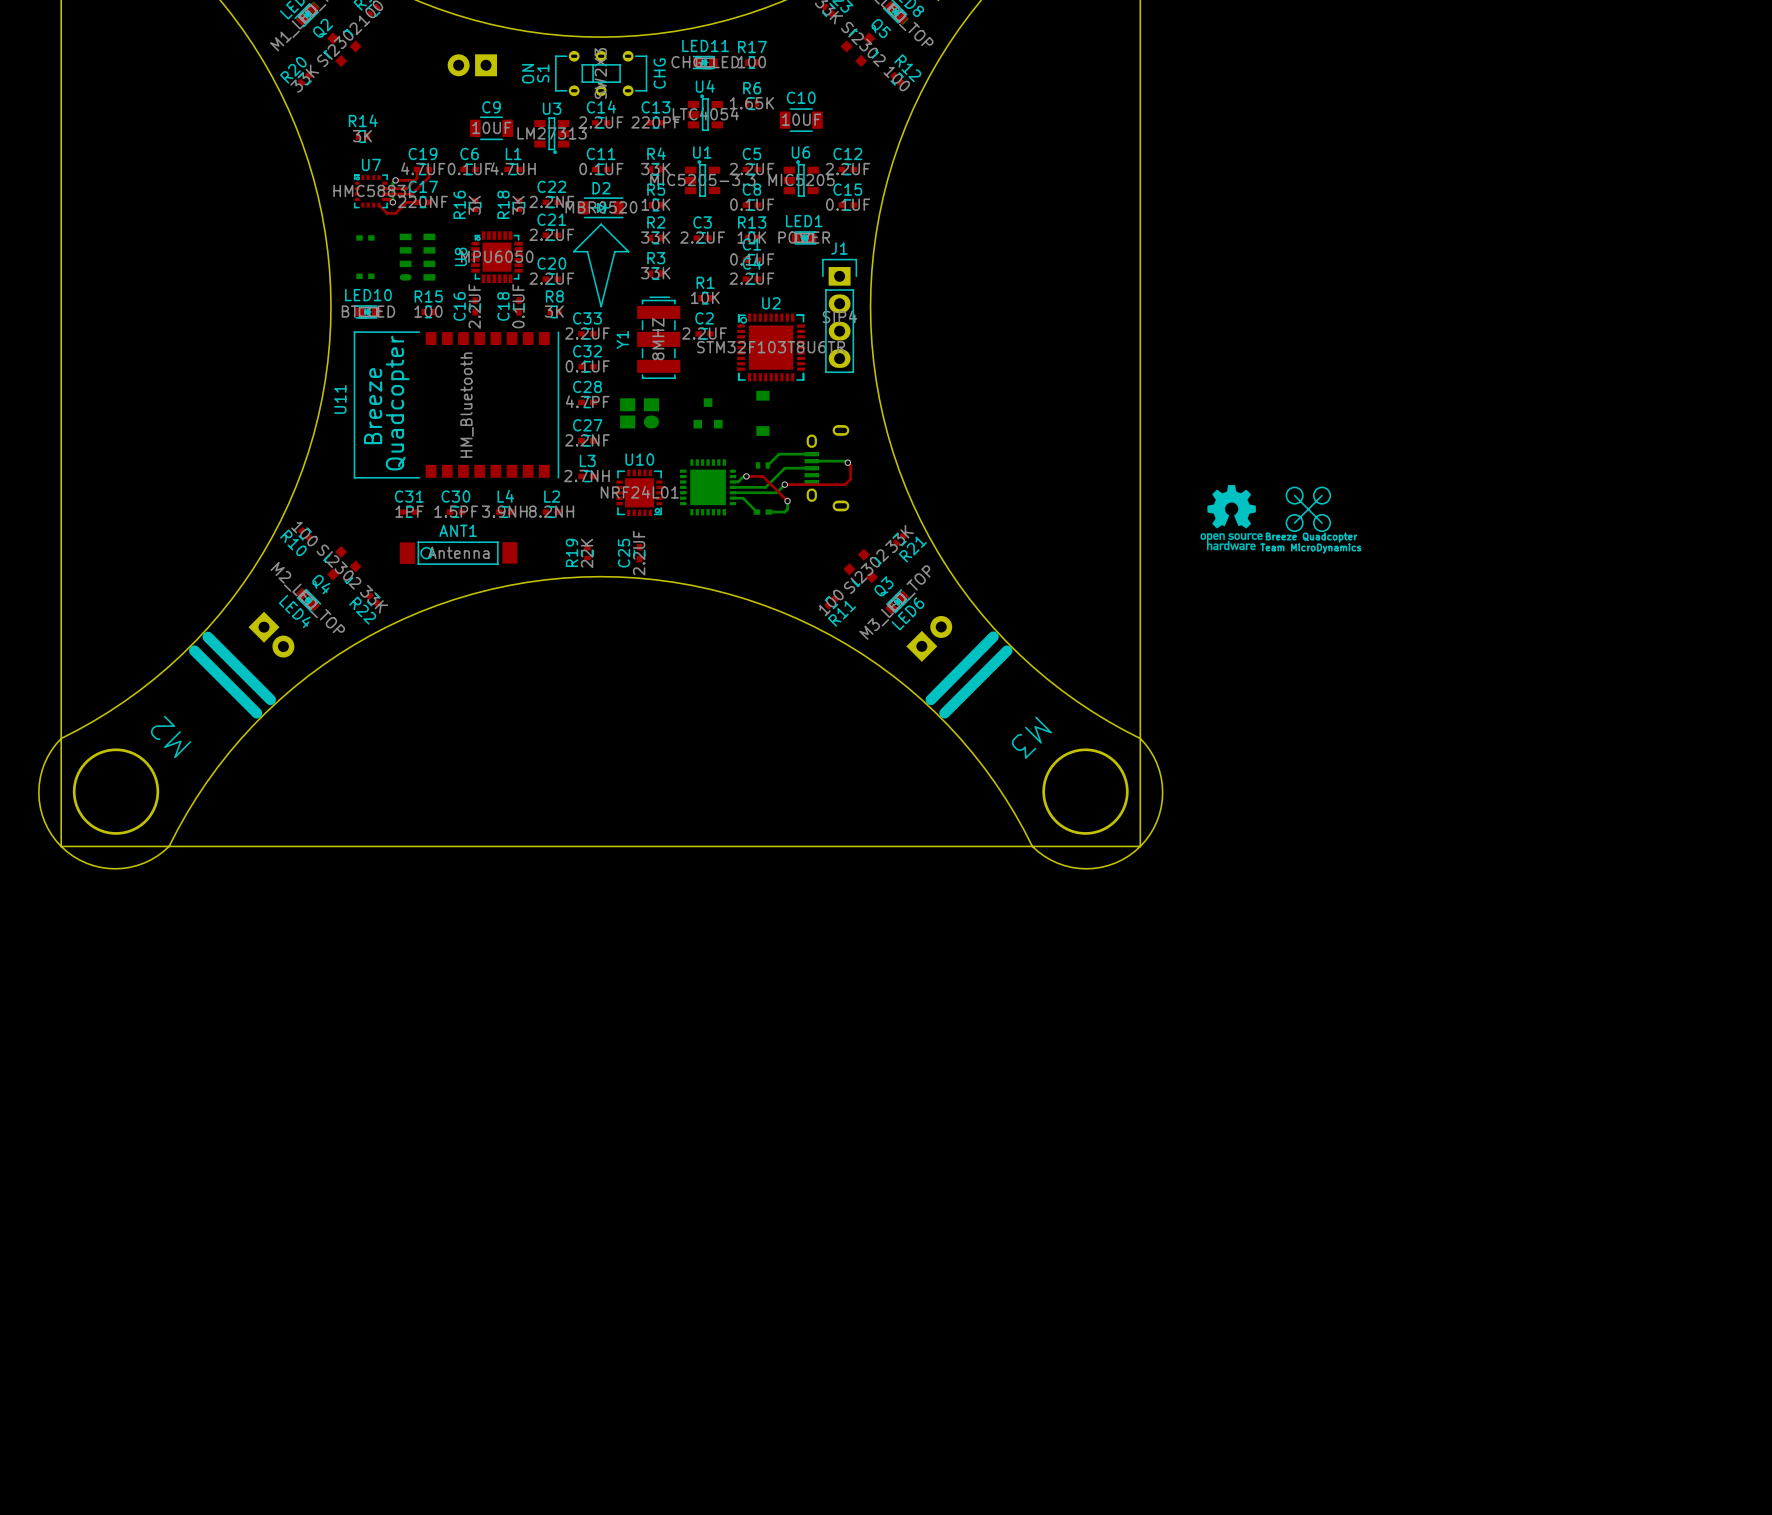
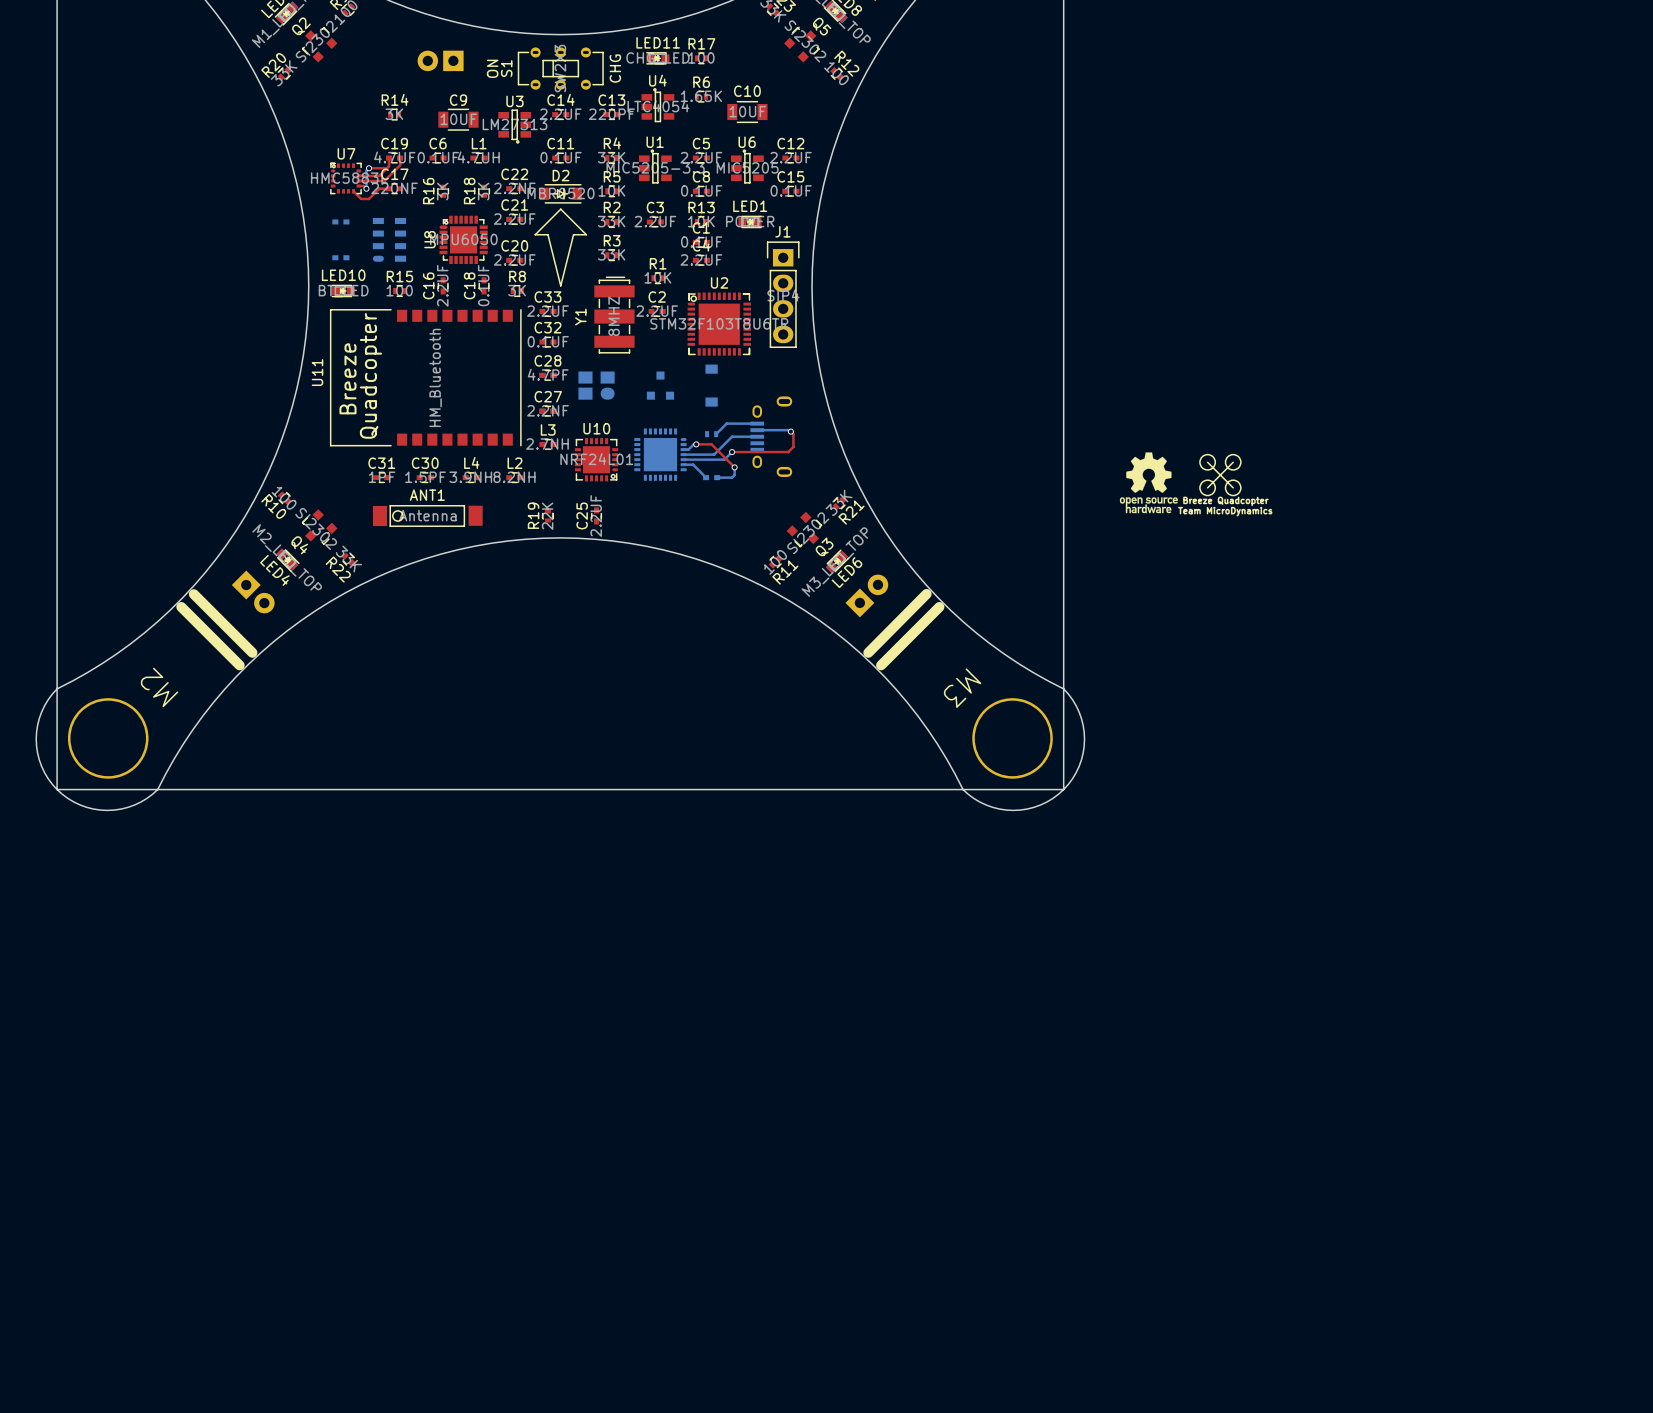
R14 position: (362, 136) -> (394, 114)
drawing shape: [1260, 486, 1362, 554] -> [1178, 453, 1273, 517]

